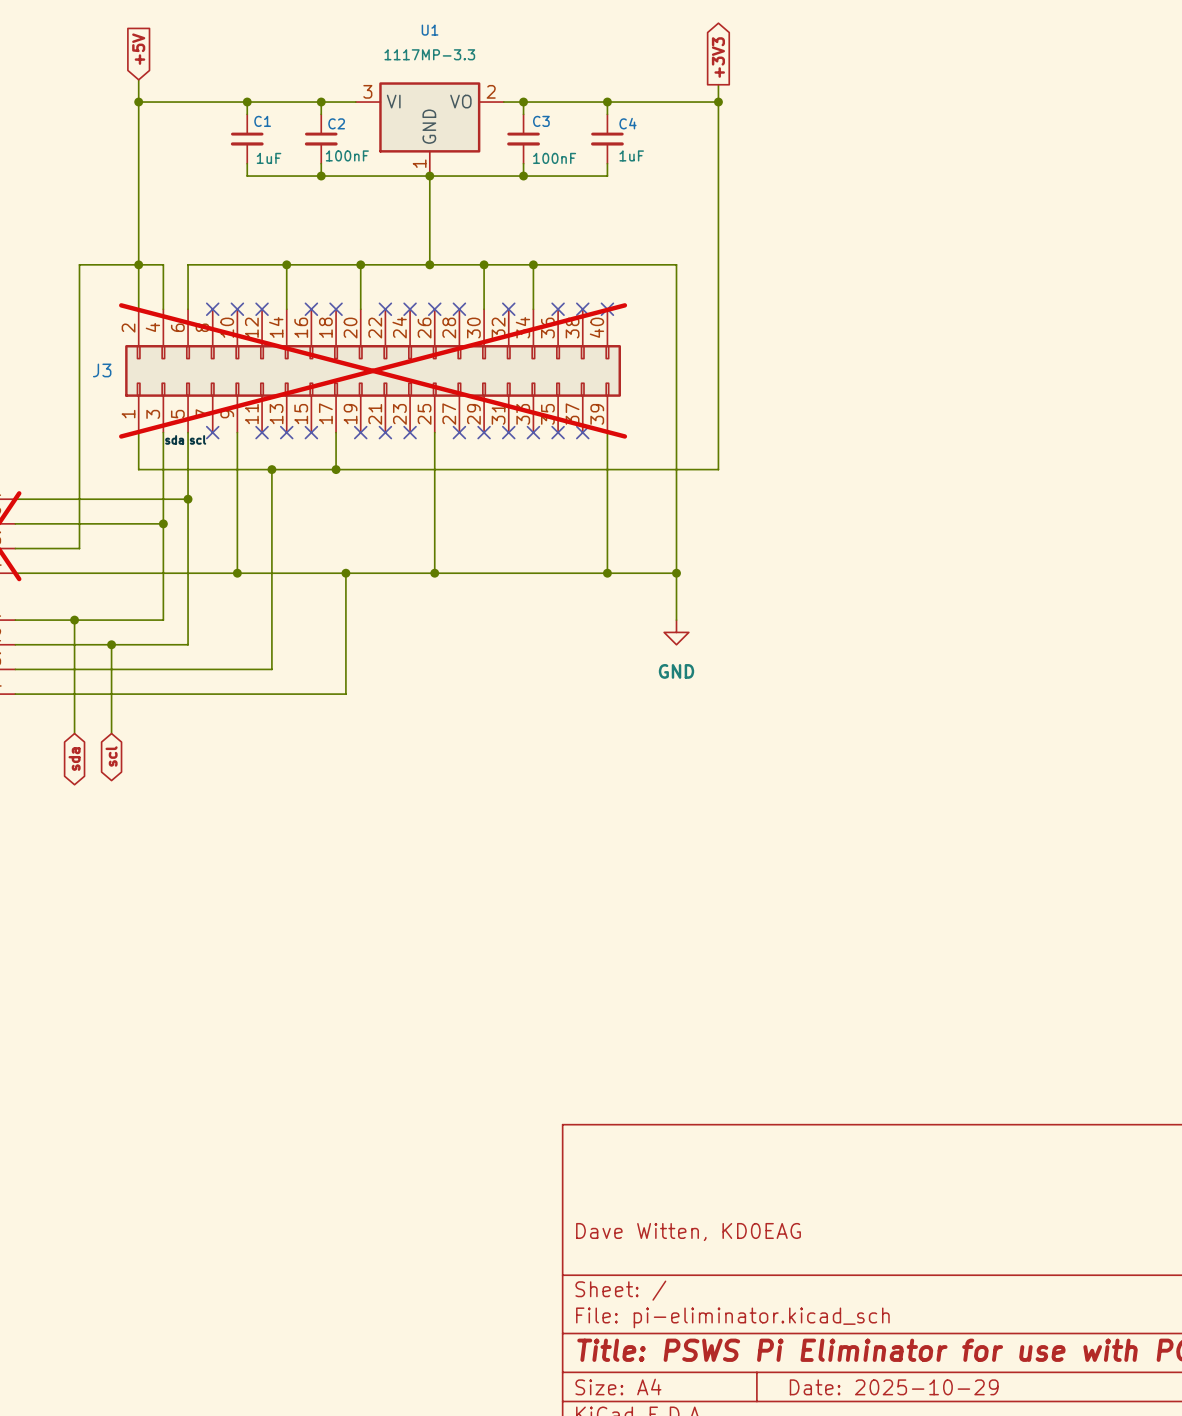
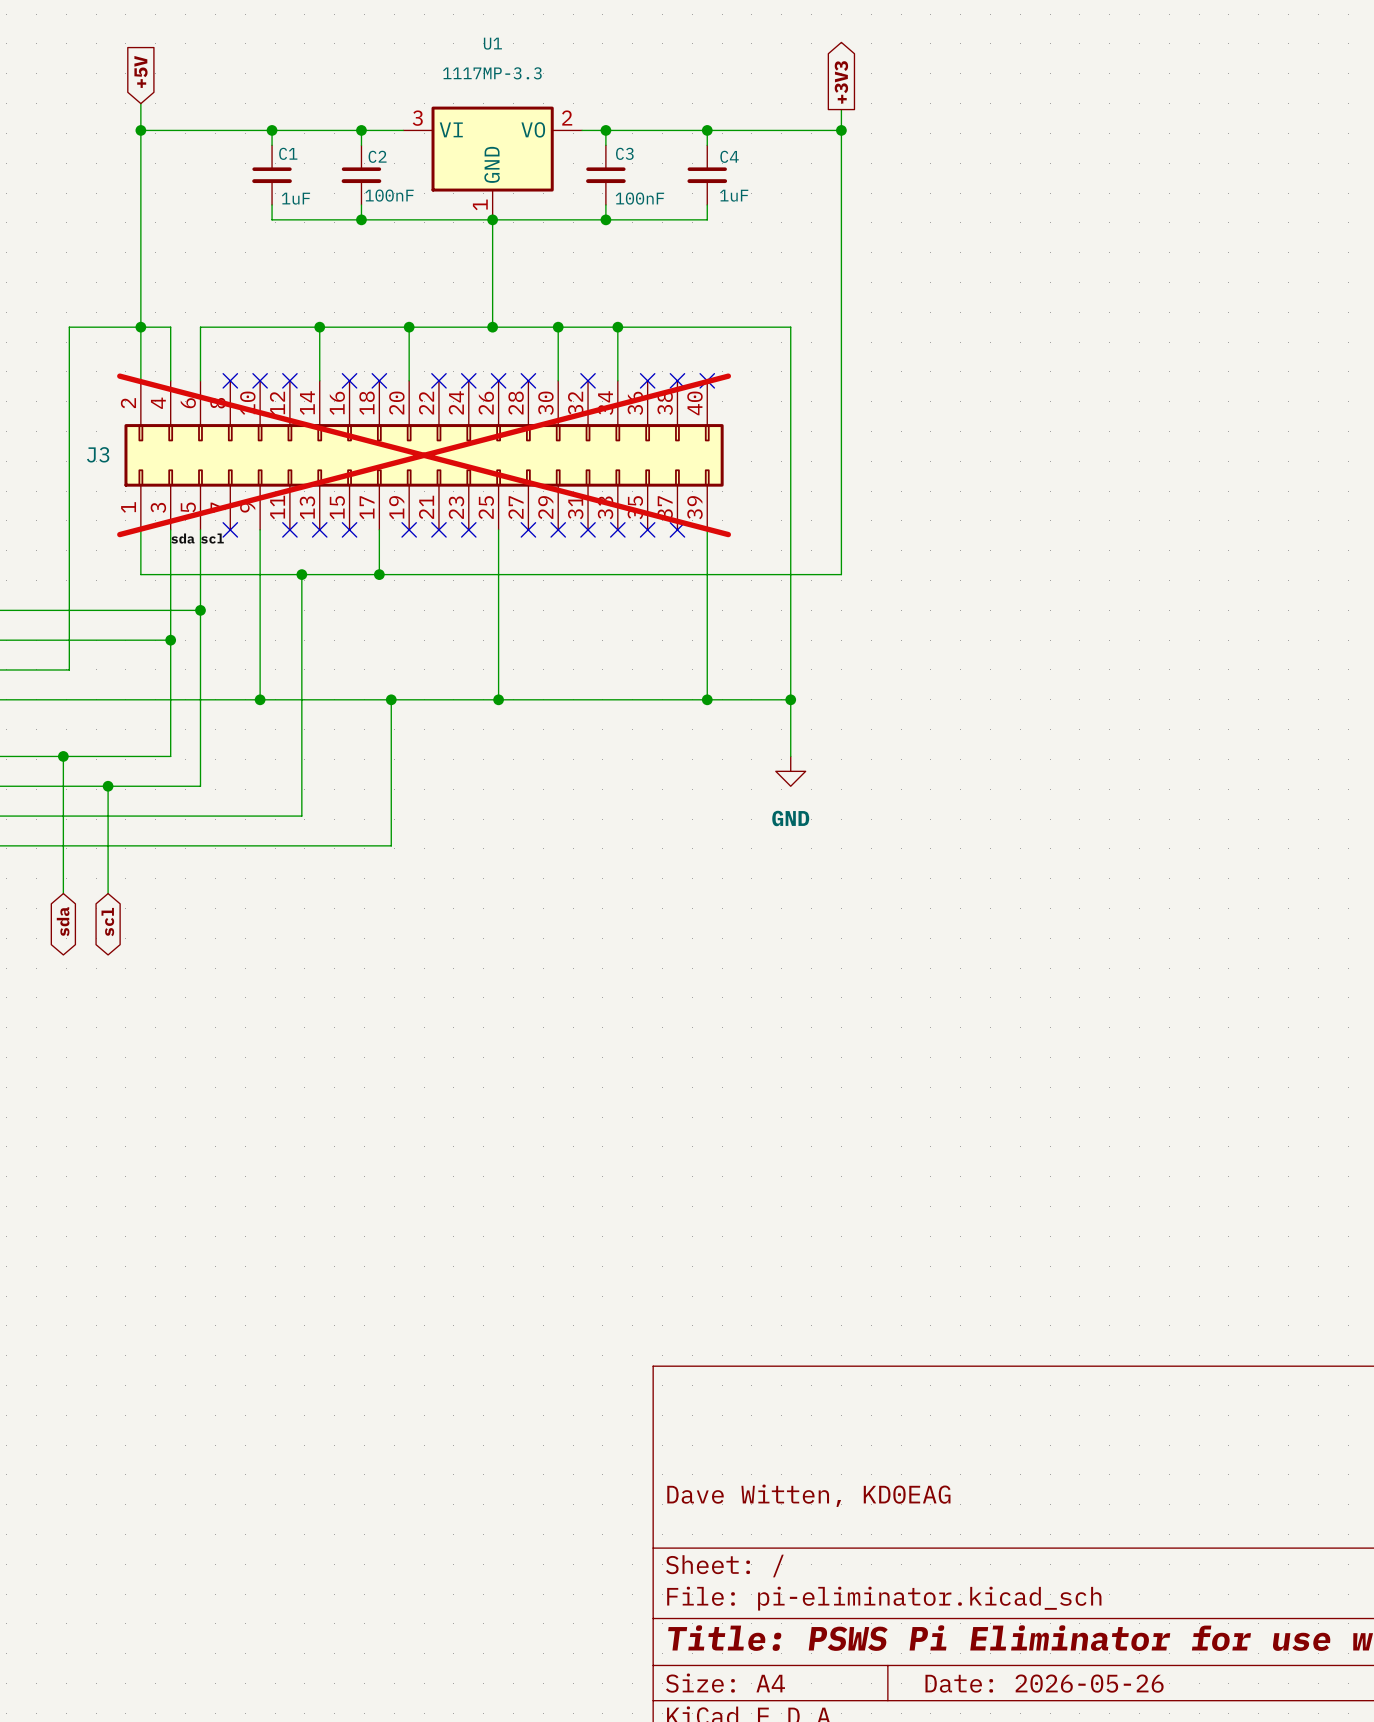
title block: Date: 2025-10-29 (894, 1387) -> Date: 2026-05-26 (1044, 1683)

